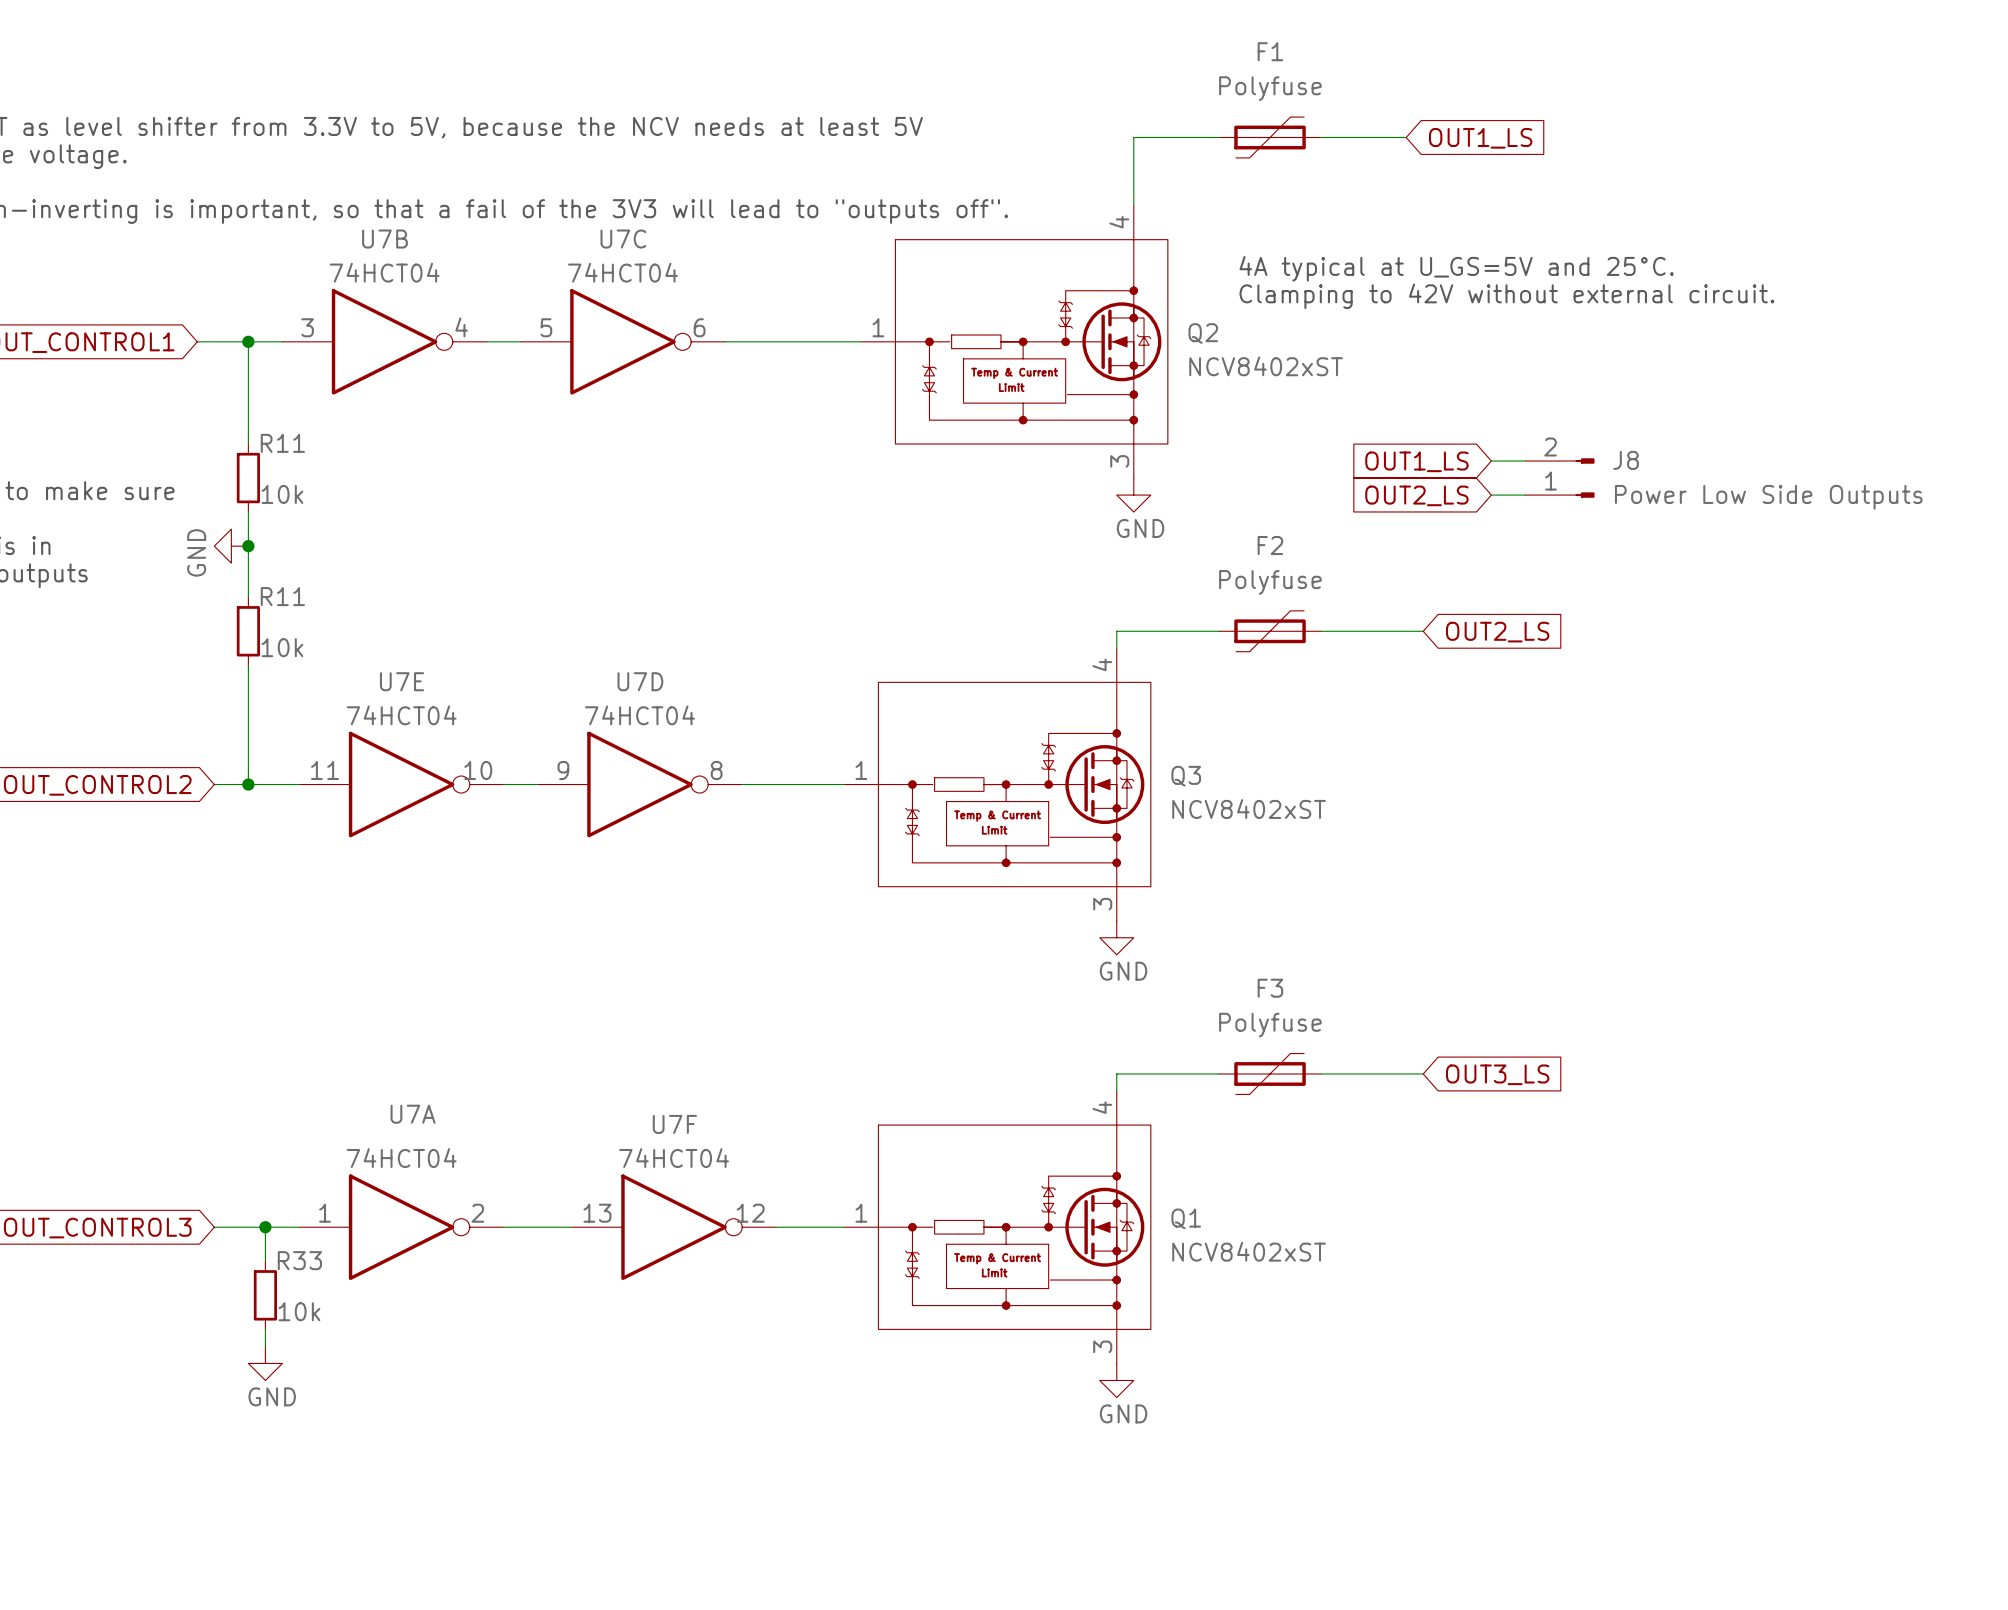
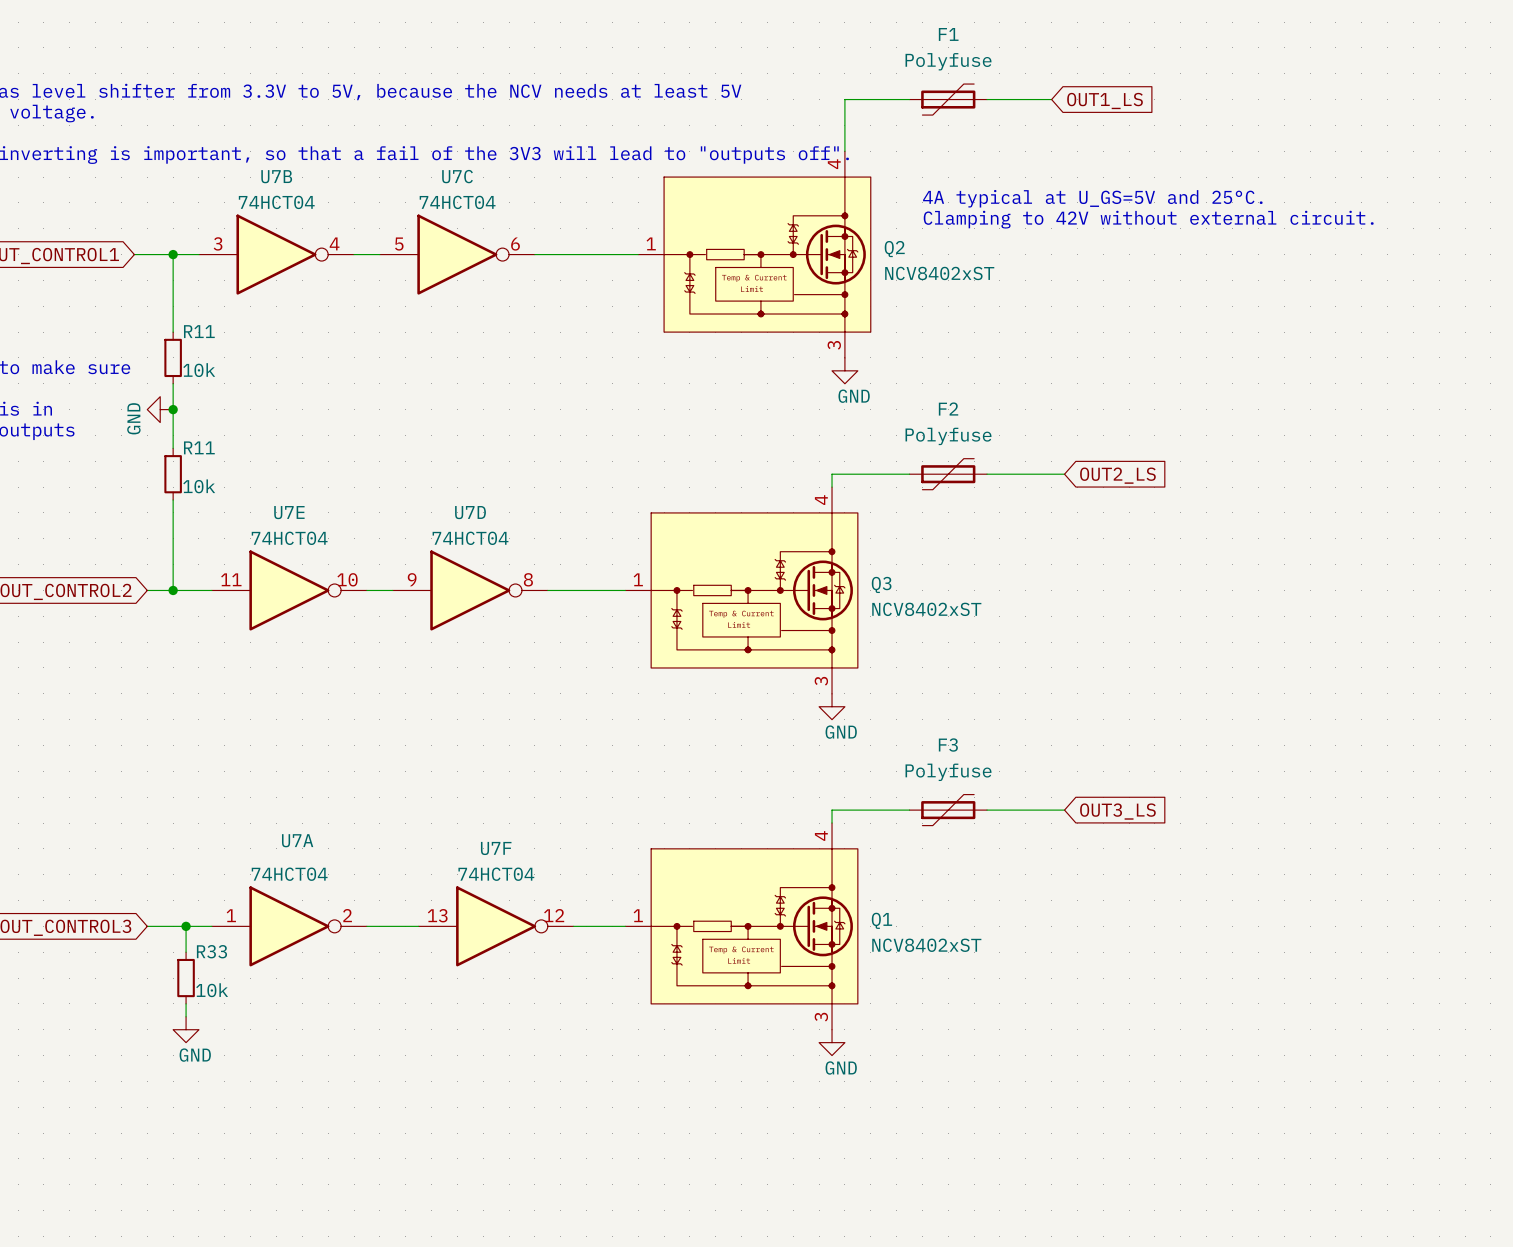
global label: OUT1_LS (1416, 461) -> none
wire: (1491, 461) (1525, 461) -> none
J8: Power Low Side Outputs (1559, 478) -> none
global label: OUT2_LS (1416, 495) -> none
wire: (1491, 495) (1525, 495) -> none

